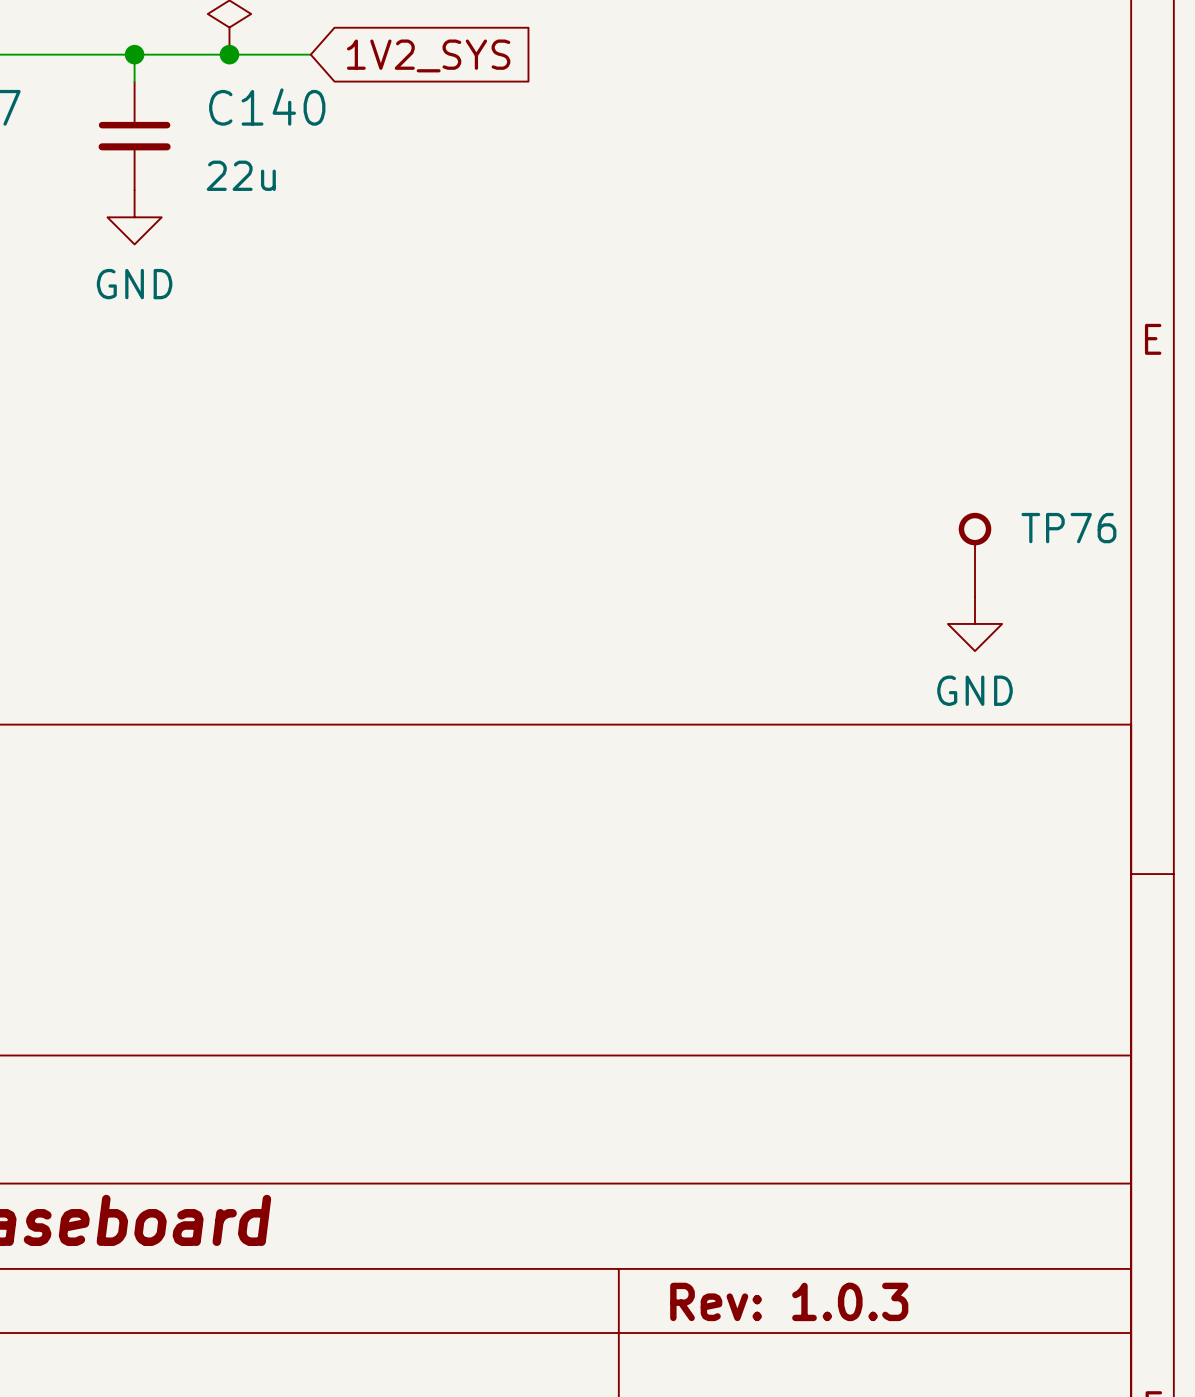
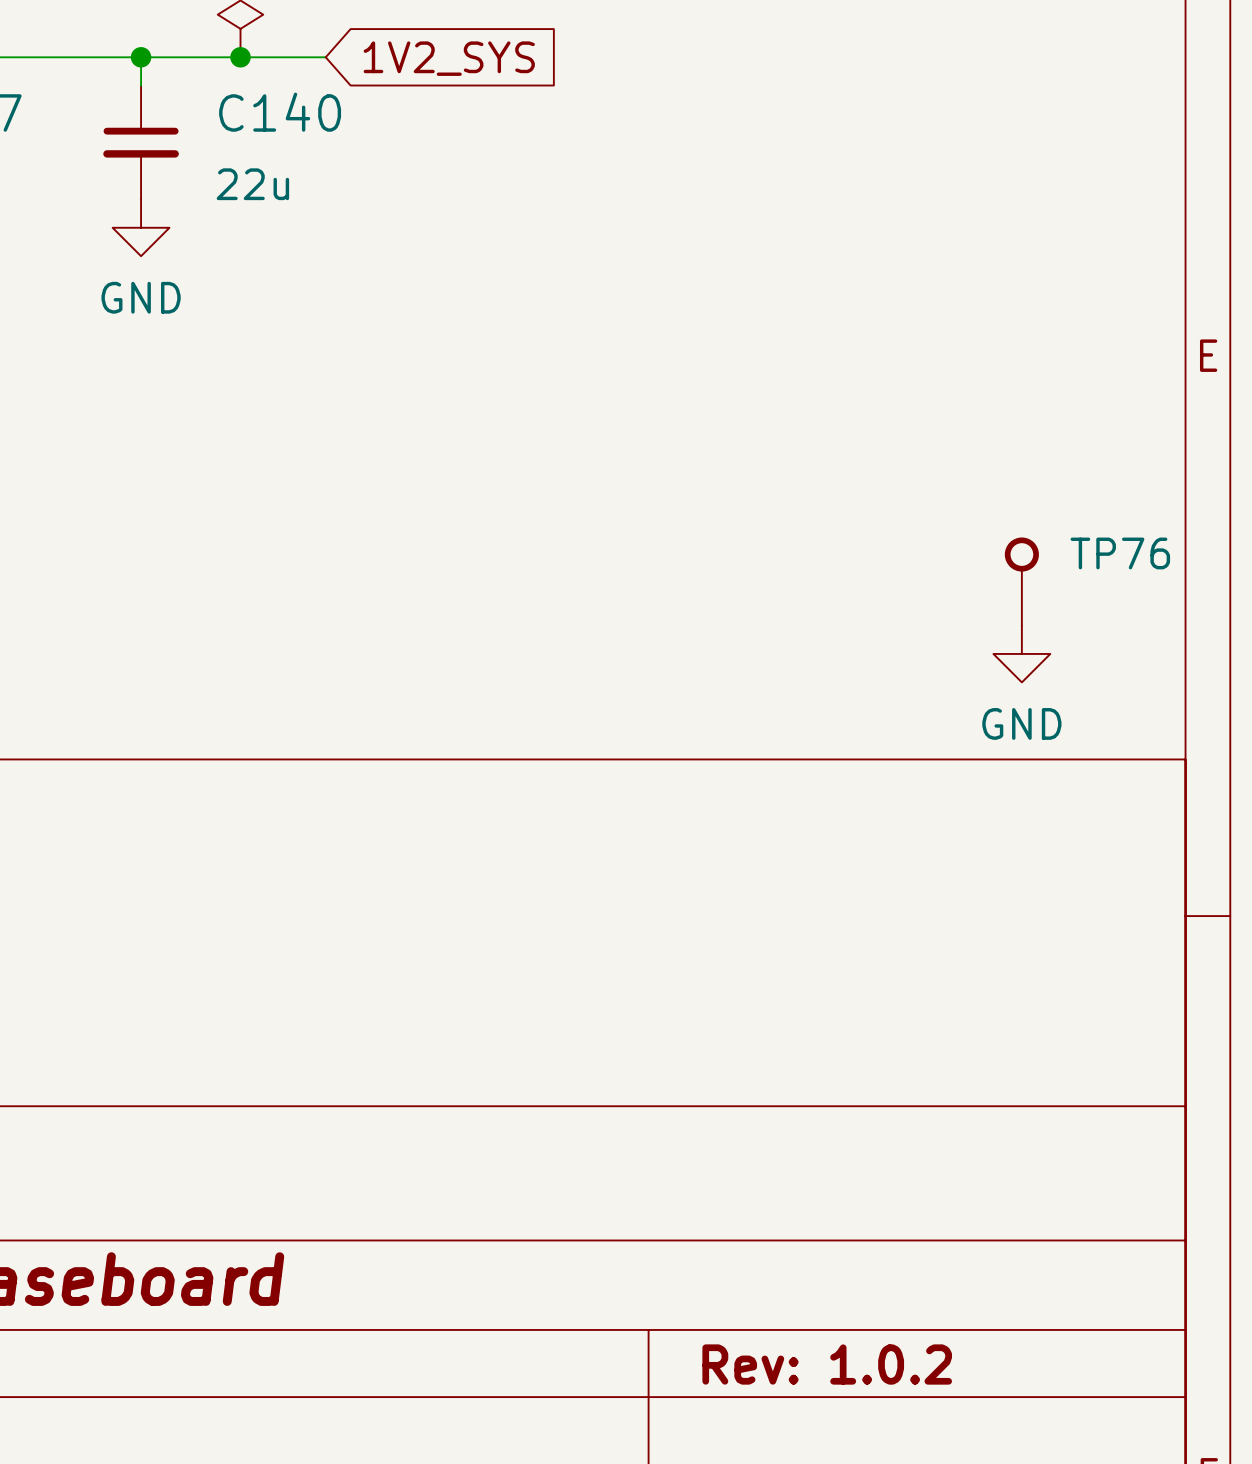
title block: Rev: 1.0.3 (789, 1301) -> Rev: 1.0.2 (827, 1364)

